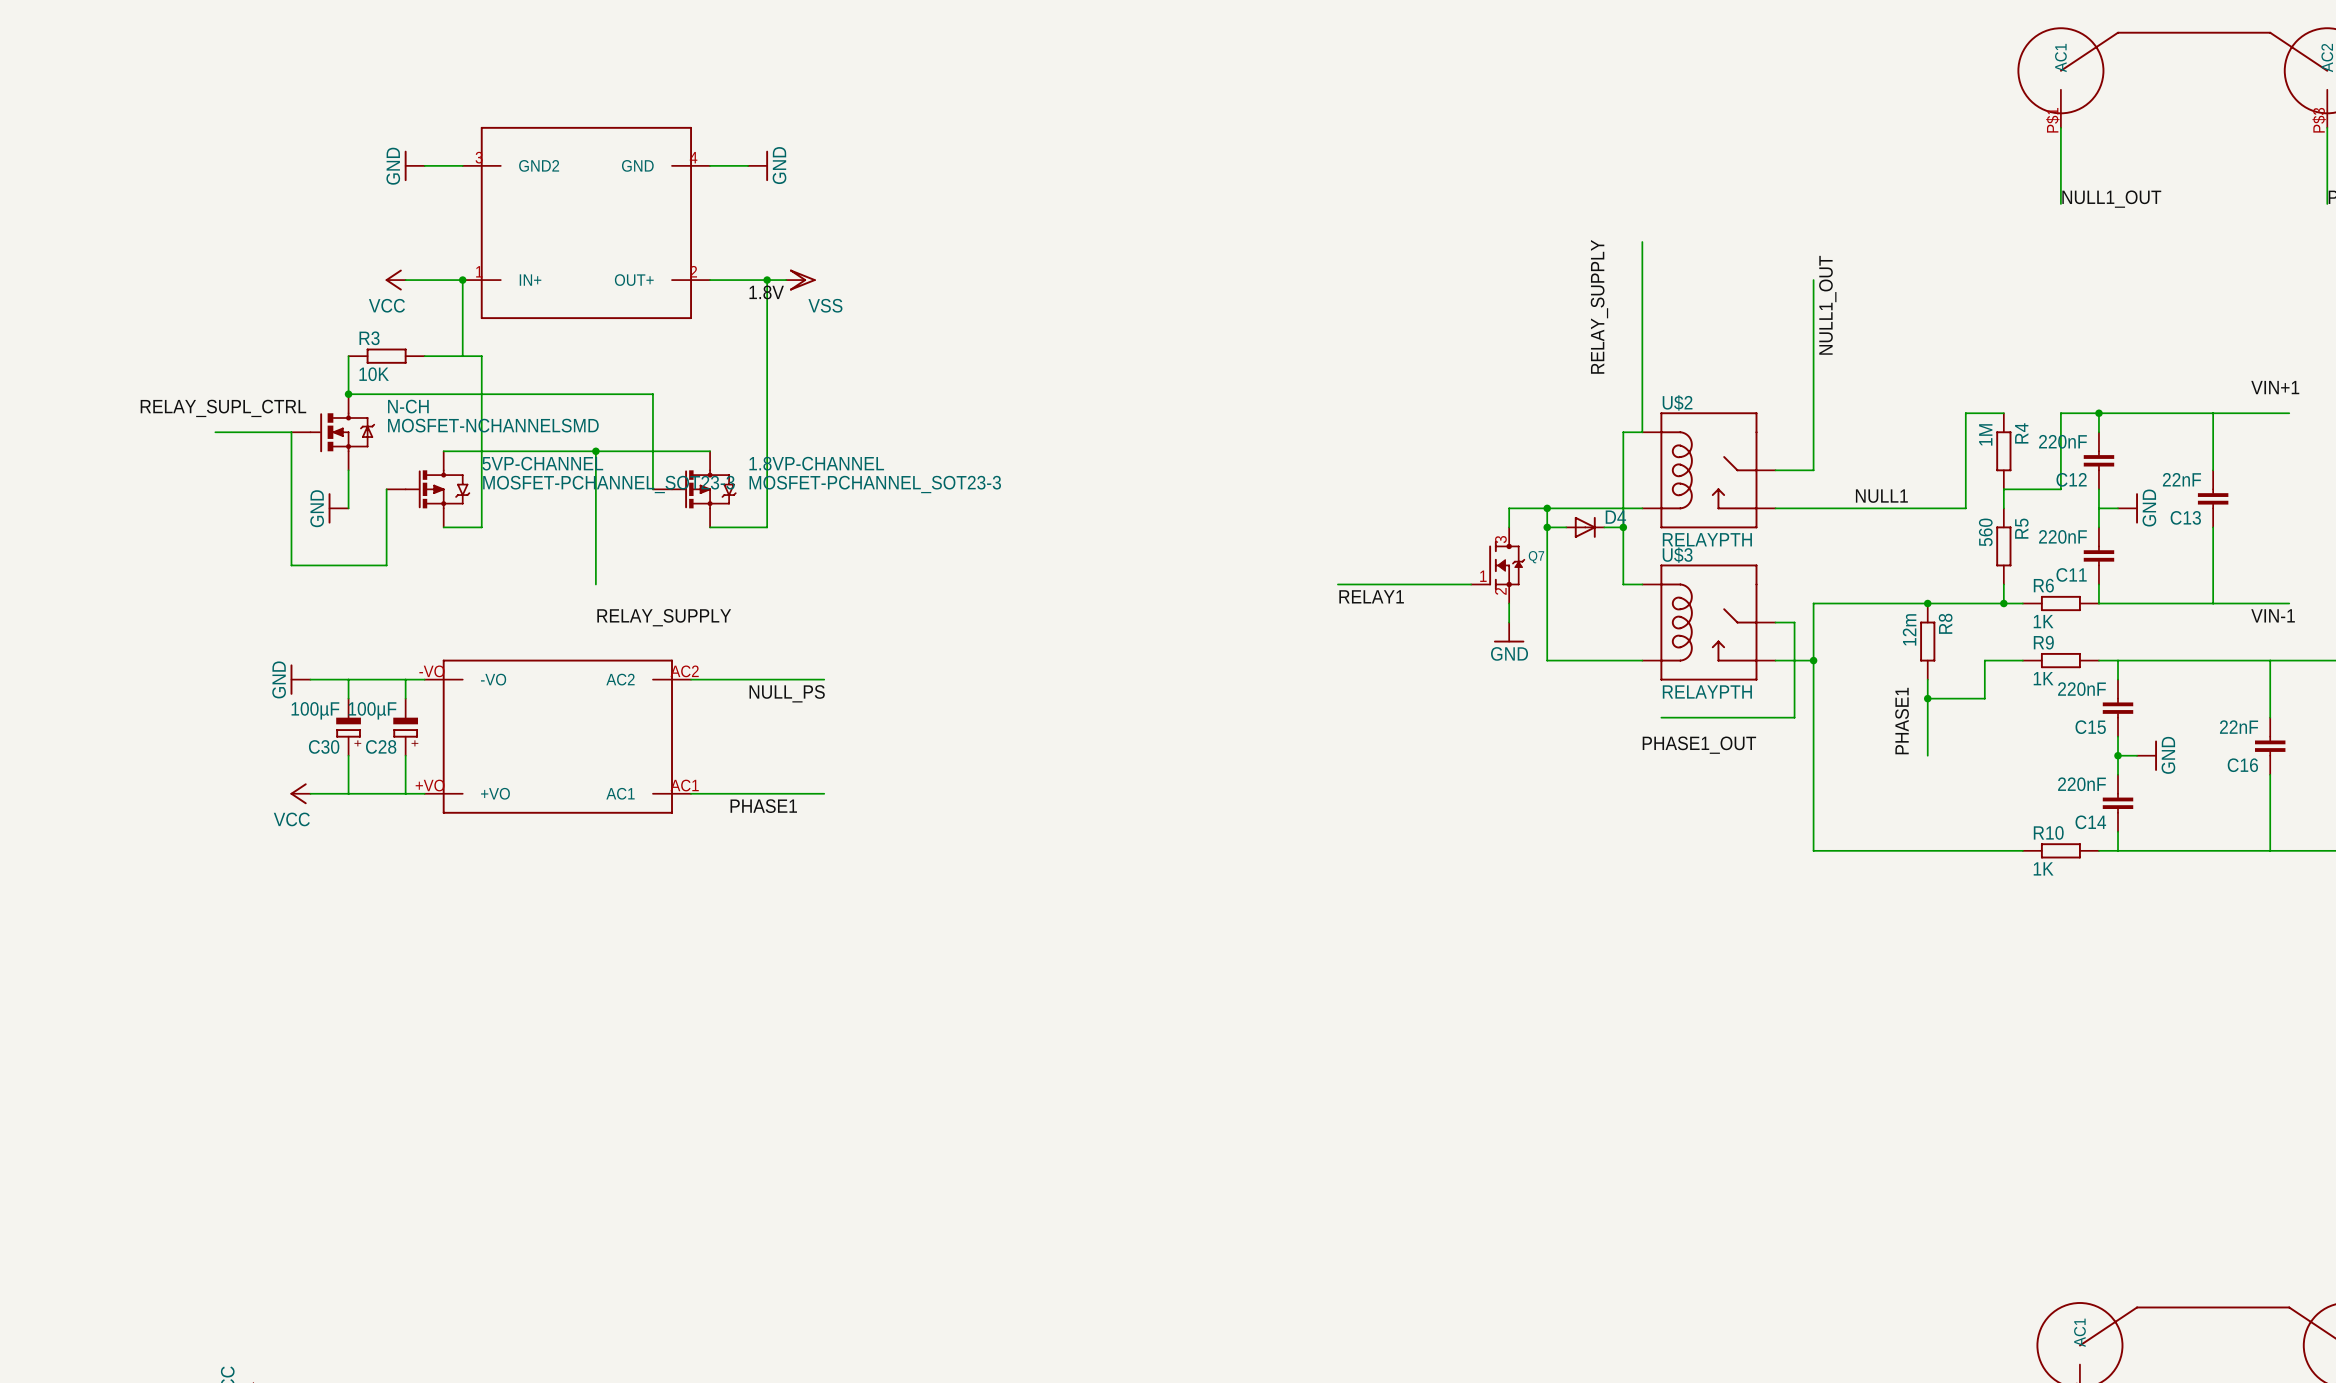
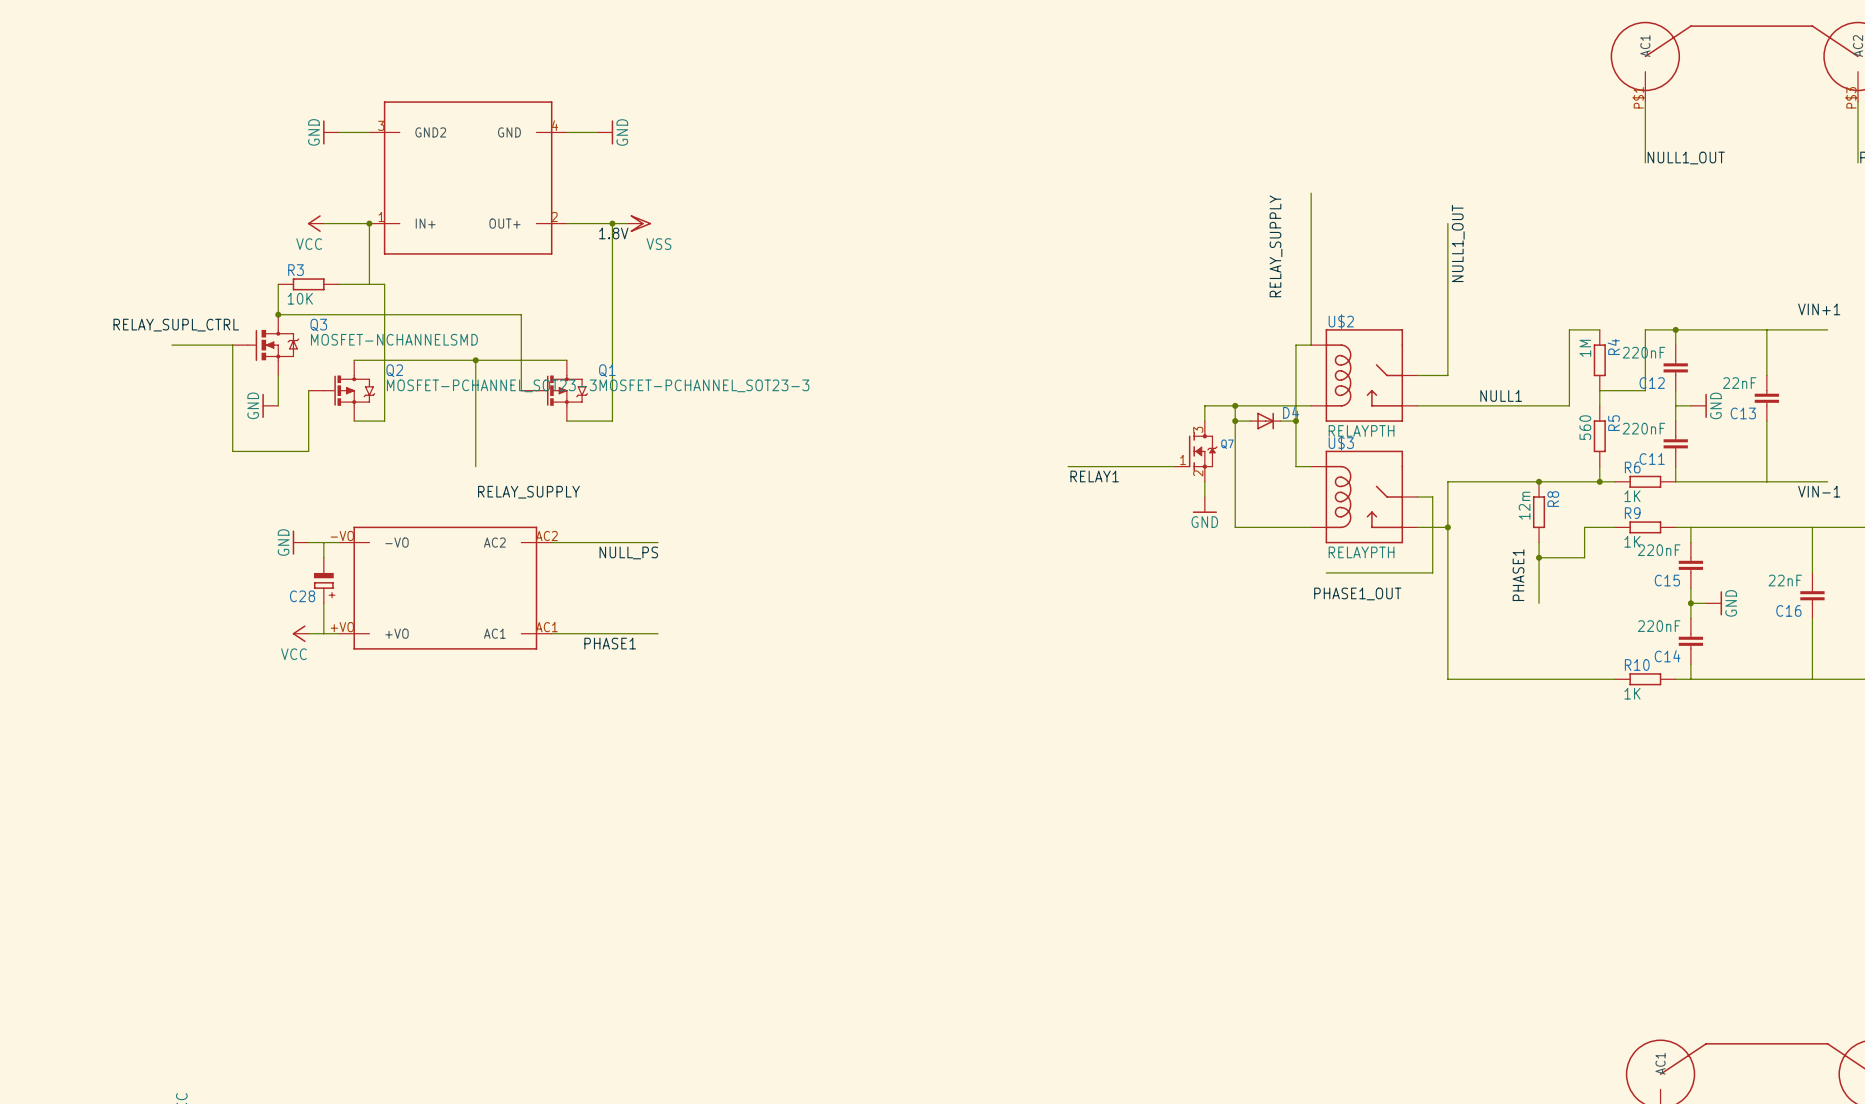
N-CH name: N-CH (408, 406) -> Q3 (318, 325)
5VP-CHANNEL name: 5VP-CHANNEL (542, 463) -> Q2 (394, 370)
1.8VP-CHANNEL name: 1.8VP-CHANNEL (816, 463) -> Q1 (607, 370)
power symbol position: GND (300, 679) -> GND (300, 542)
wire: (310, 679) (386, 679) -> none
wire: (348, 679) (348, 698) -> none
C28 value: 100µF (372, 710) -> none
C30: 100µF (348, 727) -> none
wire: (348, 755) (348, 793) -> none
power symbol position: VCC (300, 793) -> VCC (300, 633)
wire: (310, 793) (386, 793) -> none

